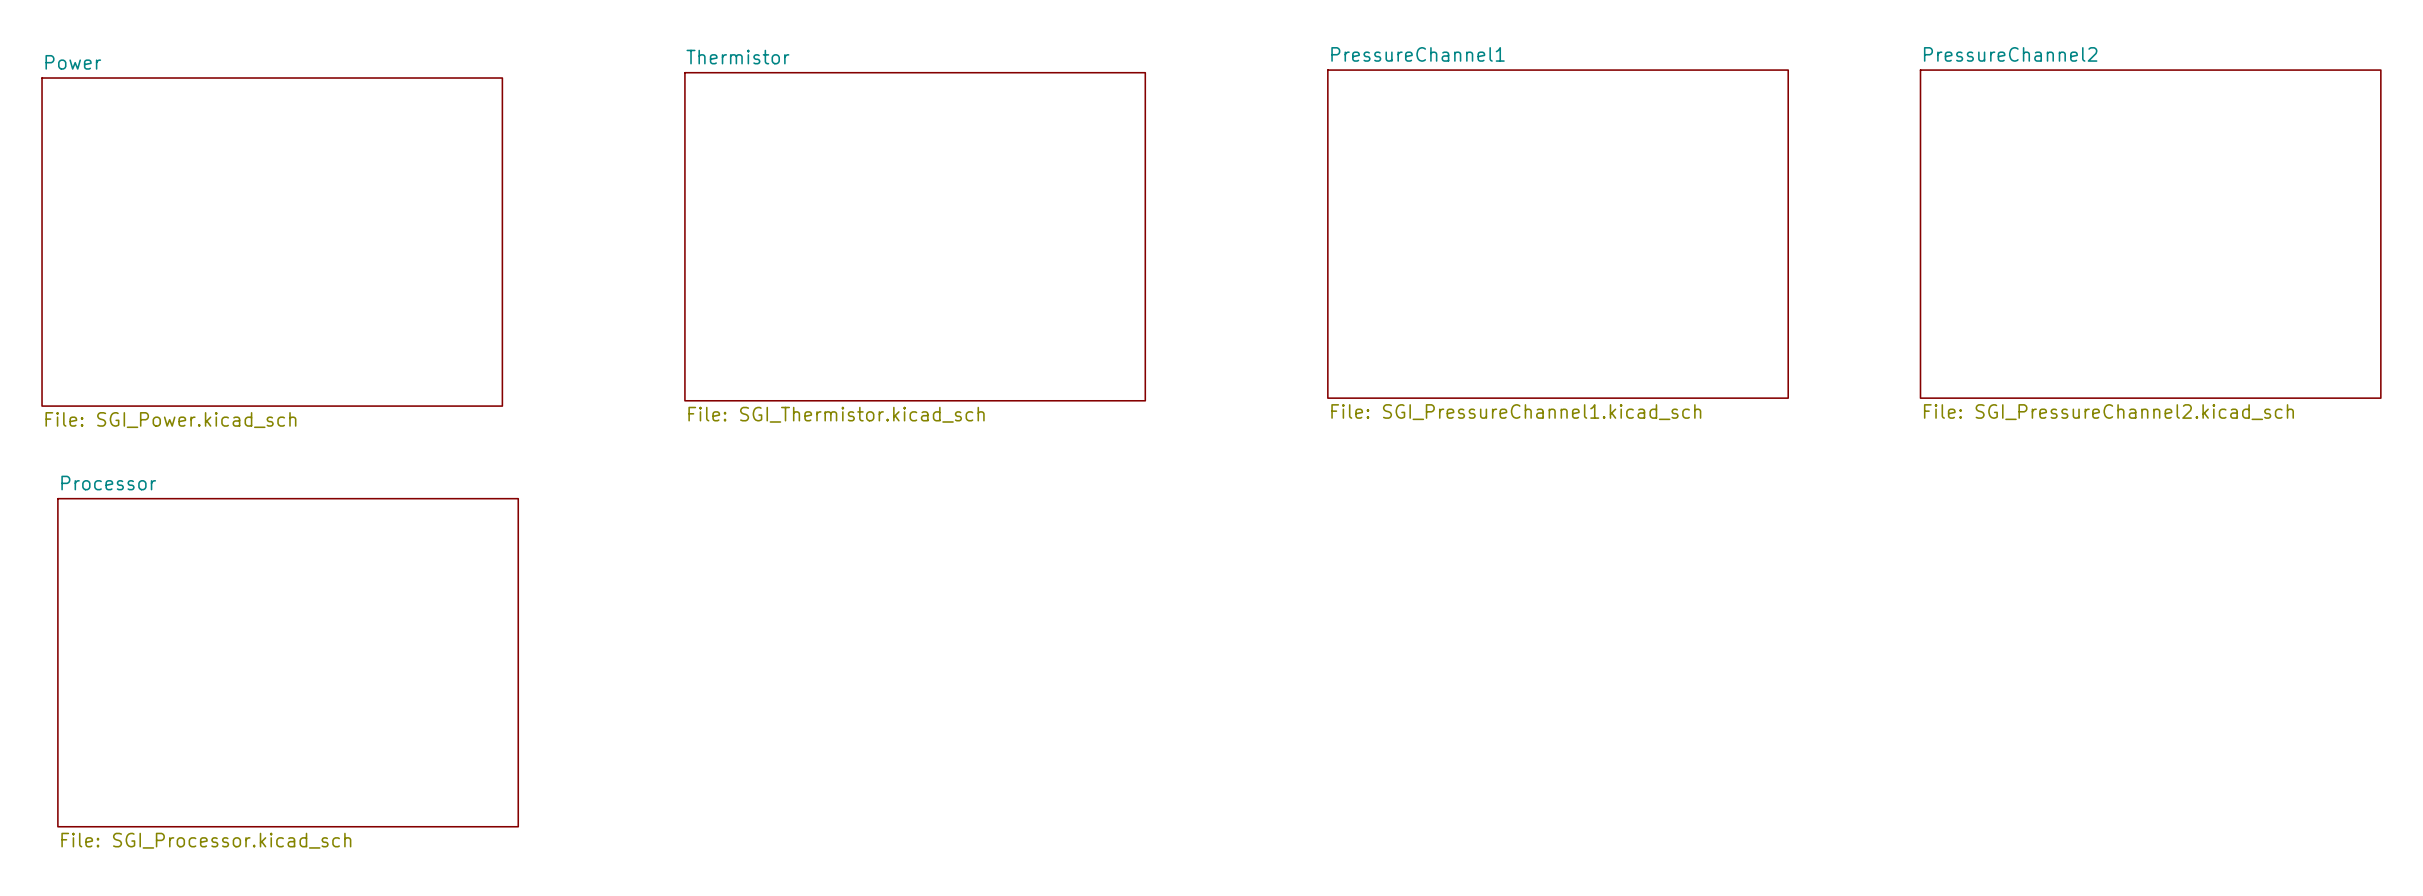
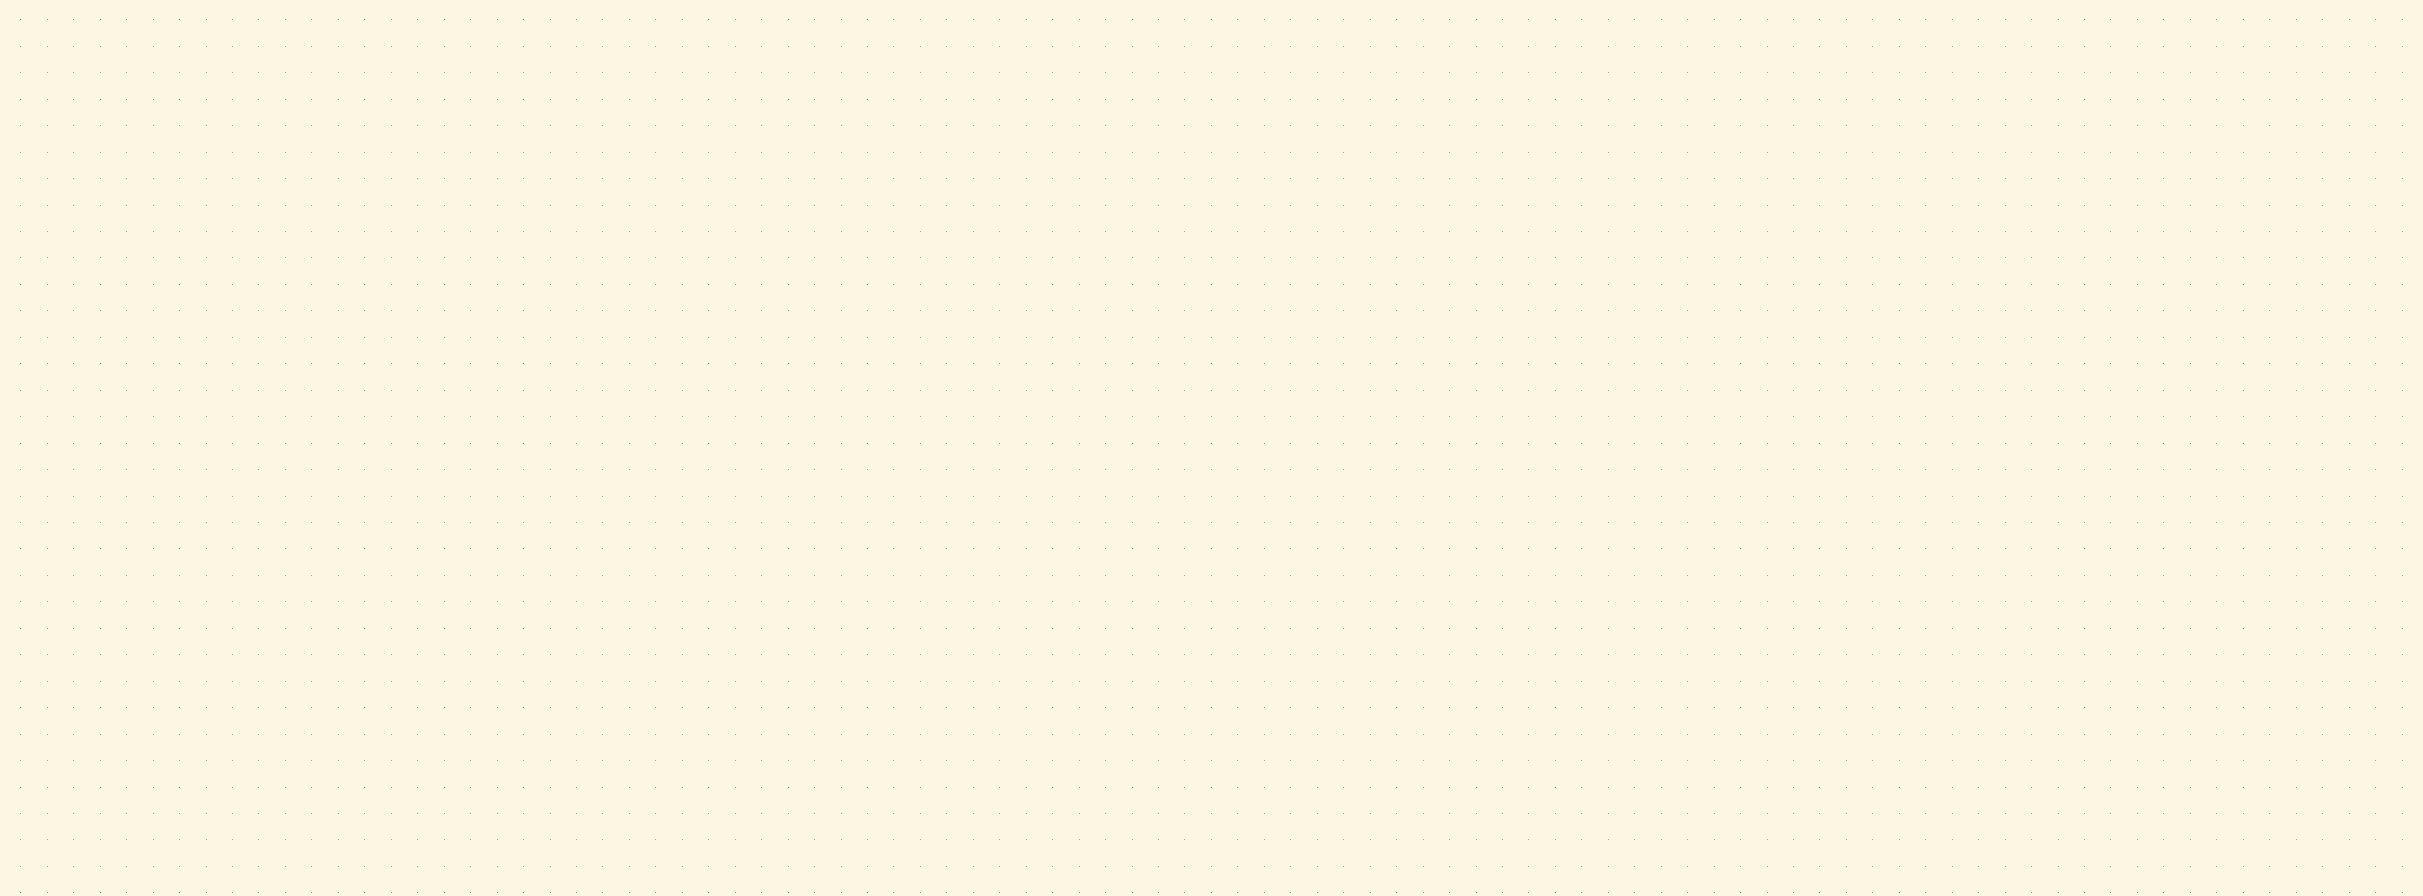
sheet PressureChannel1: File: SGI_PressureChannel1.kicad_sch (1558, 234) -> none
sheet PressureChannel2: File: SGI_PressureChannel2.kicad_sch (2150, 234) -> none
sheet Thermistor: File: SGI_Thermistor.kicad_sch (915, 236) -> none
sheet Power: File: SGI_Power.kicad_sch (272, 242) -> none
sheet Processor: File: SGI_Processor.kicad_sch (288, 662) -> none

